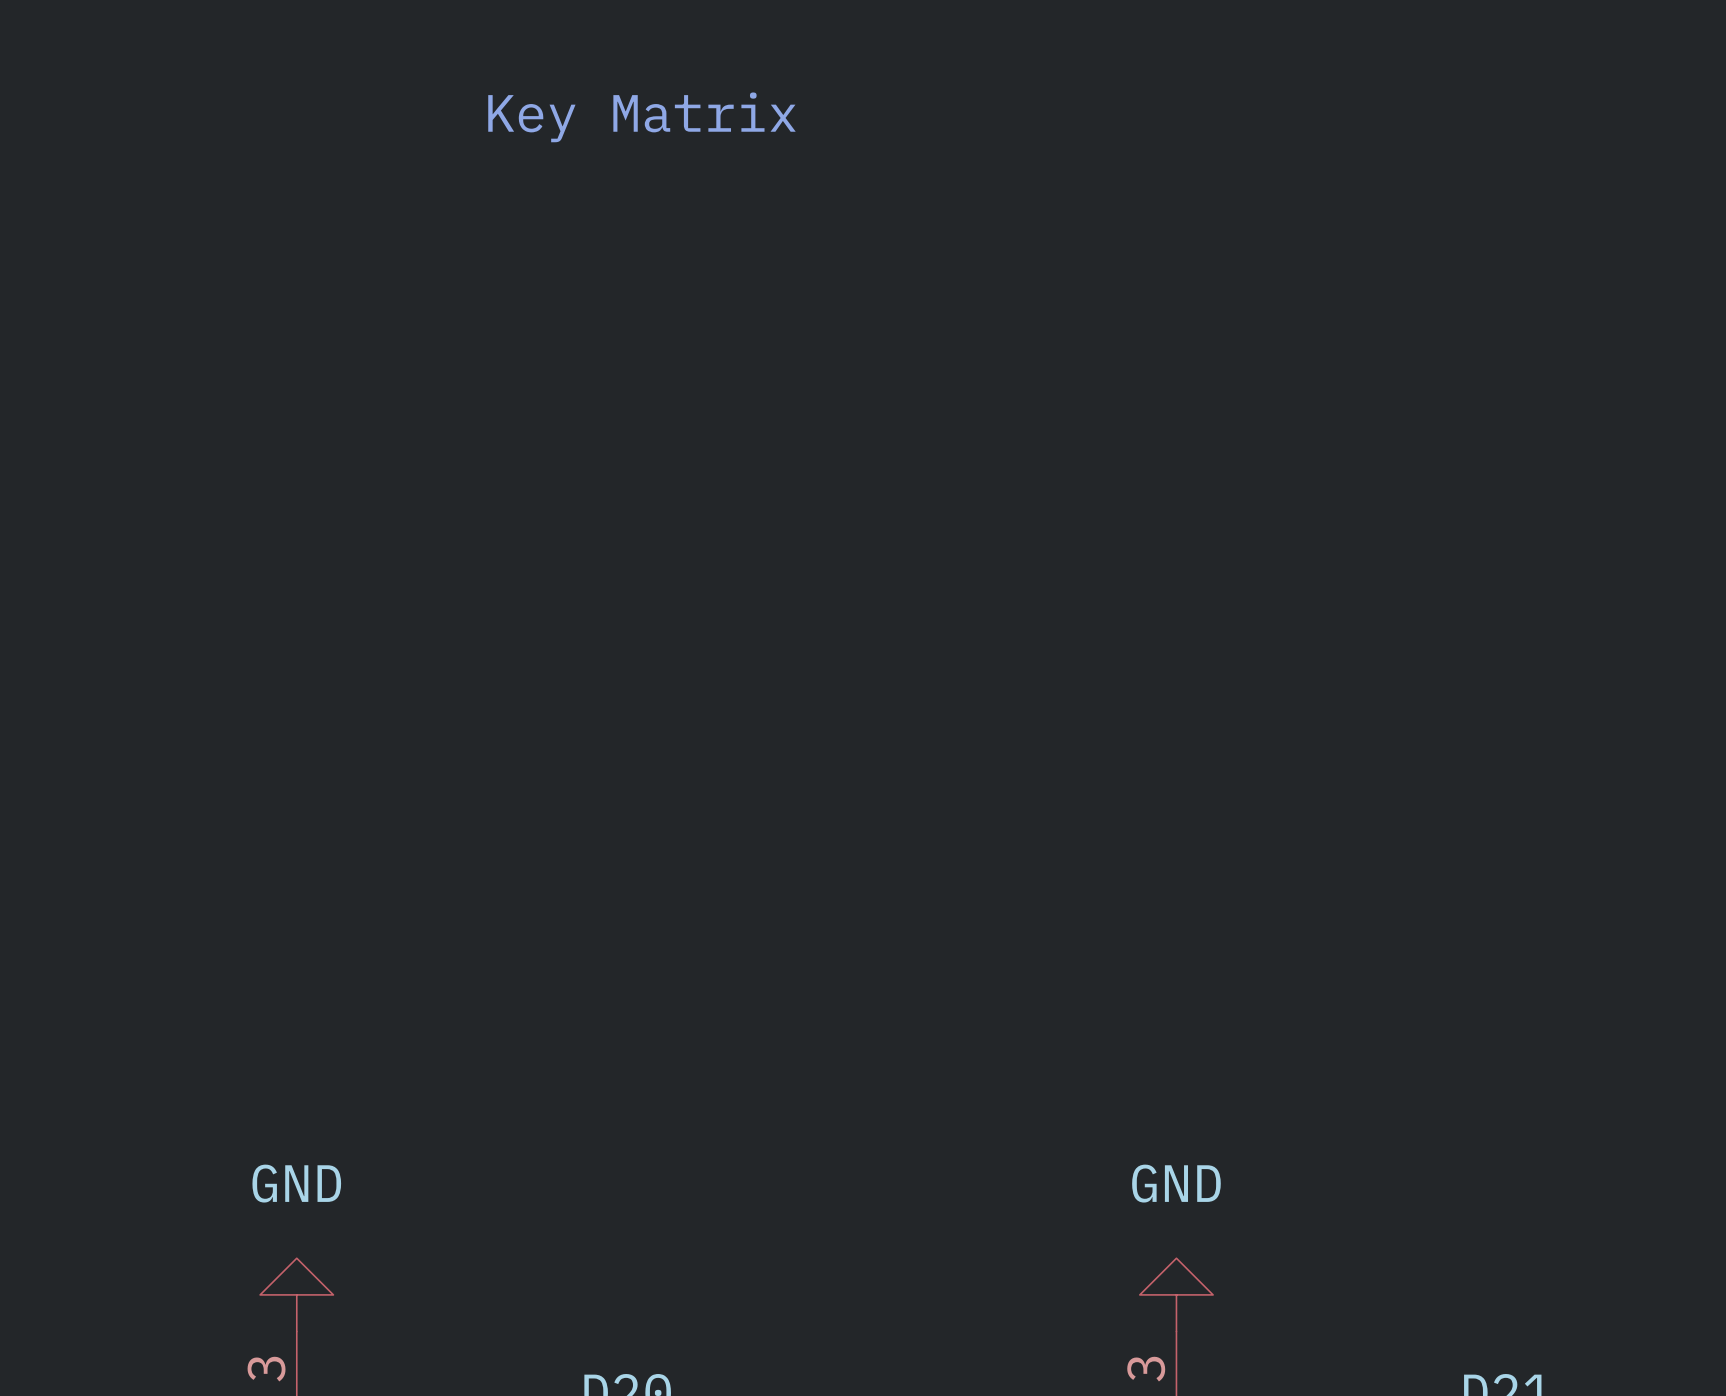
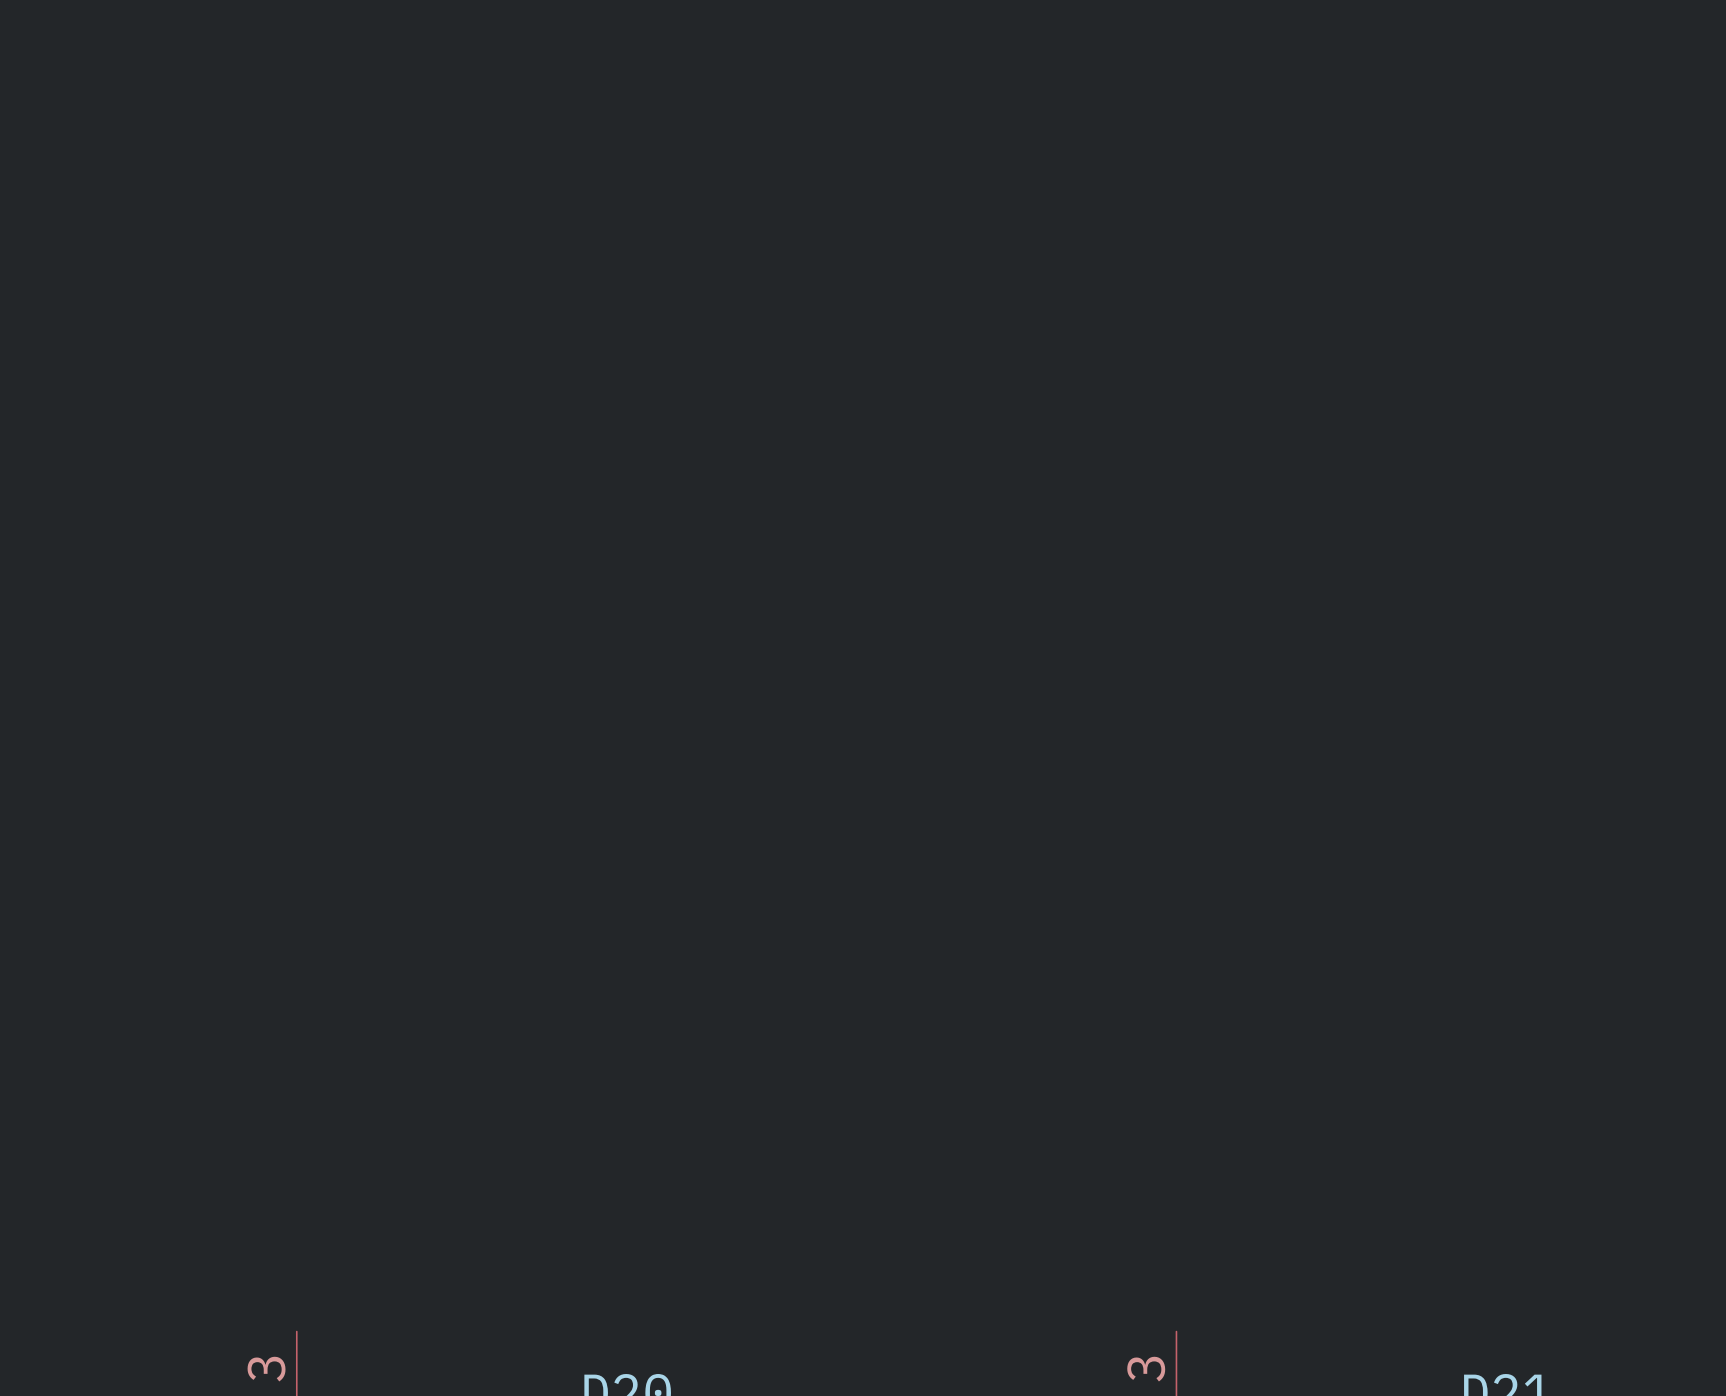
text: Key Matrix (641, 117) -> none
power symbol: GND (296, 1294) -> none
power symbol: GND (1176, 1294) -> none

